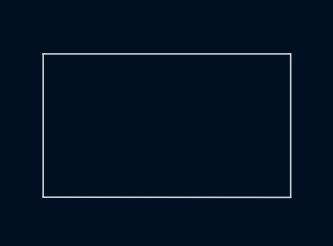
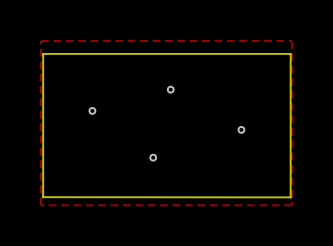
zone outline: none -> (41, 41) (41, 205) (291, 205) (291, 41) (41, 41)
via: none -> (170, 89)
via: none -> (92, 110)
via: none -> (241, 129)
via: none -> (153, 157)

